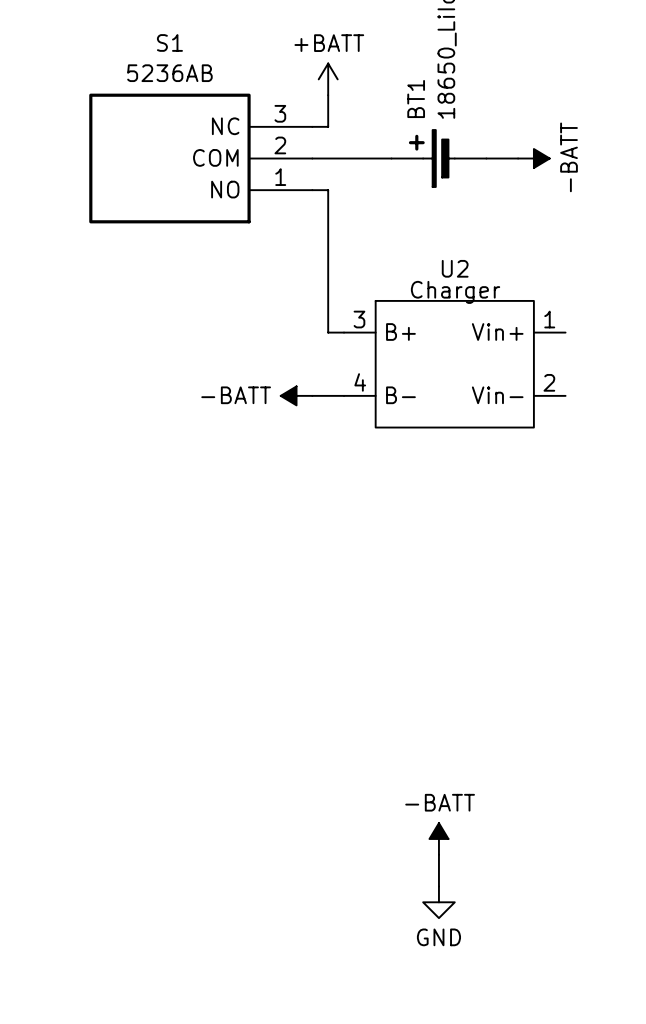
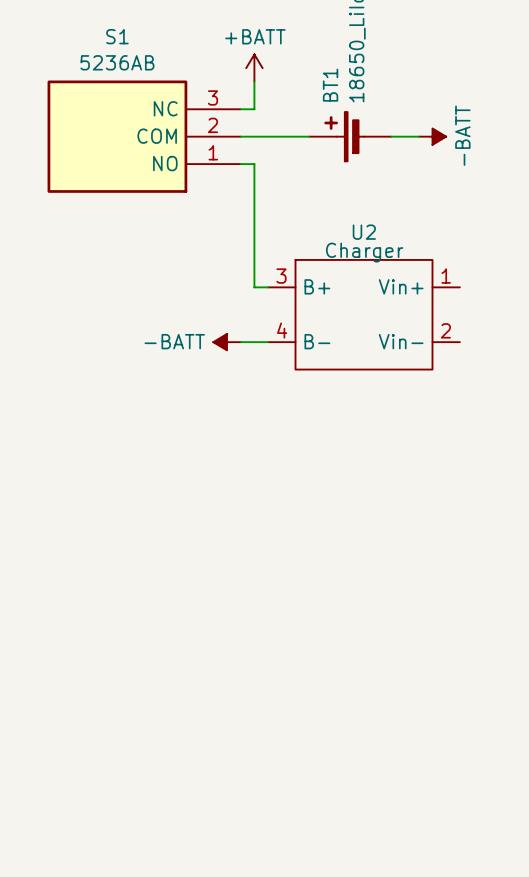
power symbol: -BATT (438, 838) -> none
wire: (438, 854) (438, 886) -> none
power symbol: GND (438, 902) -> none

